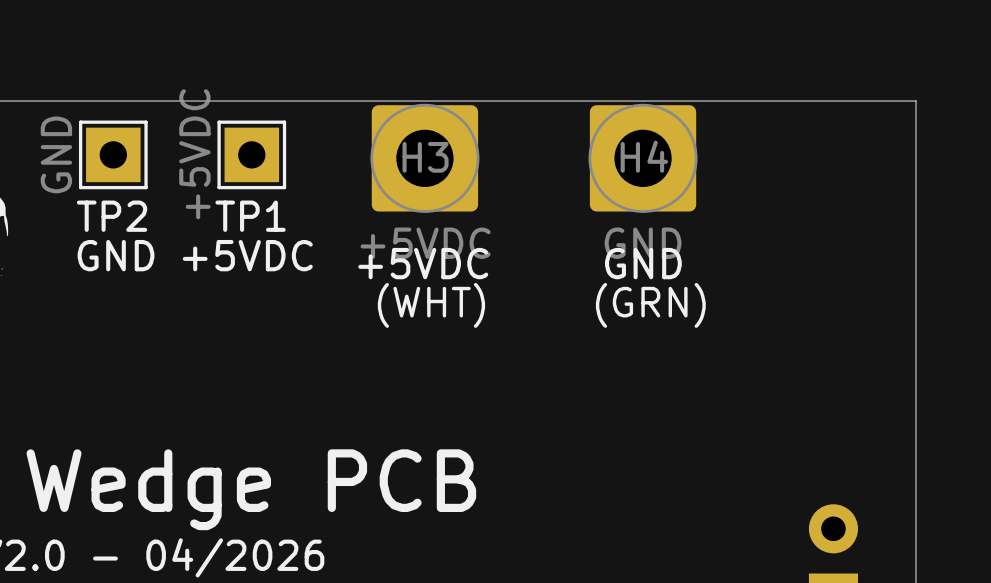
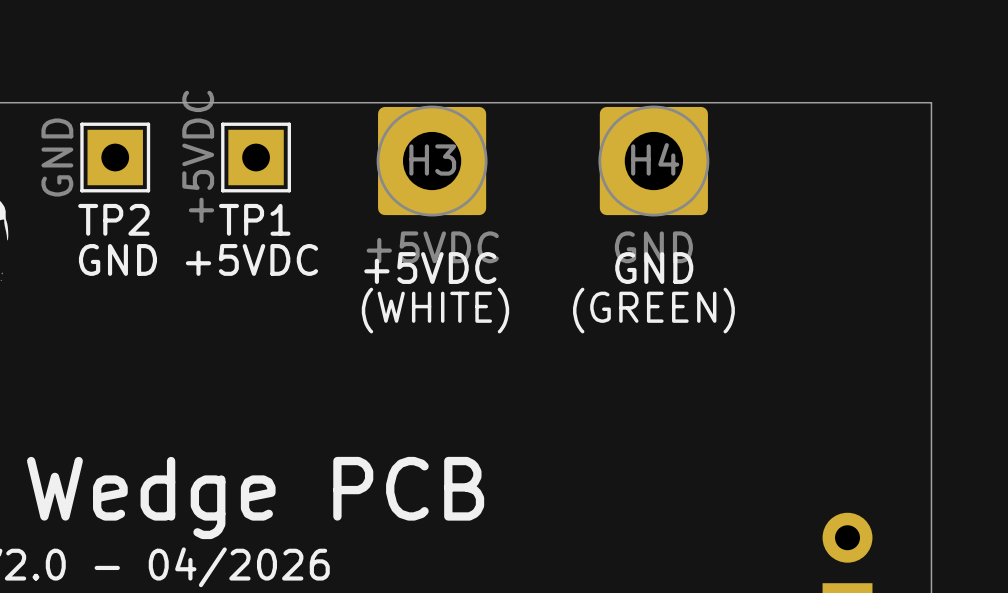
text: (WHT) (431, 305) -> (WHITE) (435, 310)
text: (GRN) (650, 305) -> (GREEN) (653, 310)

